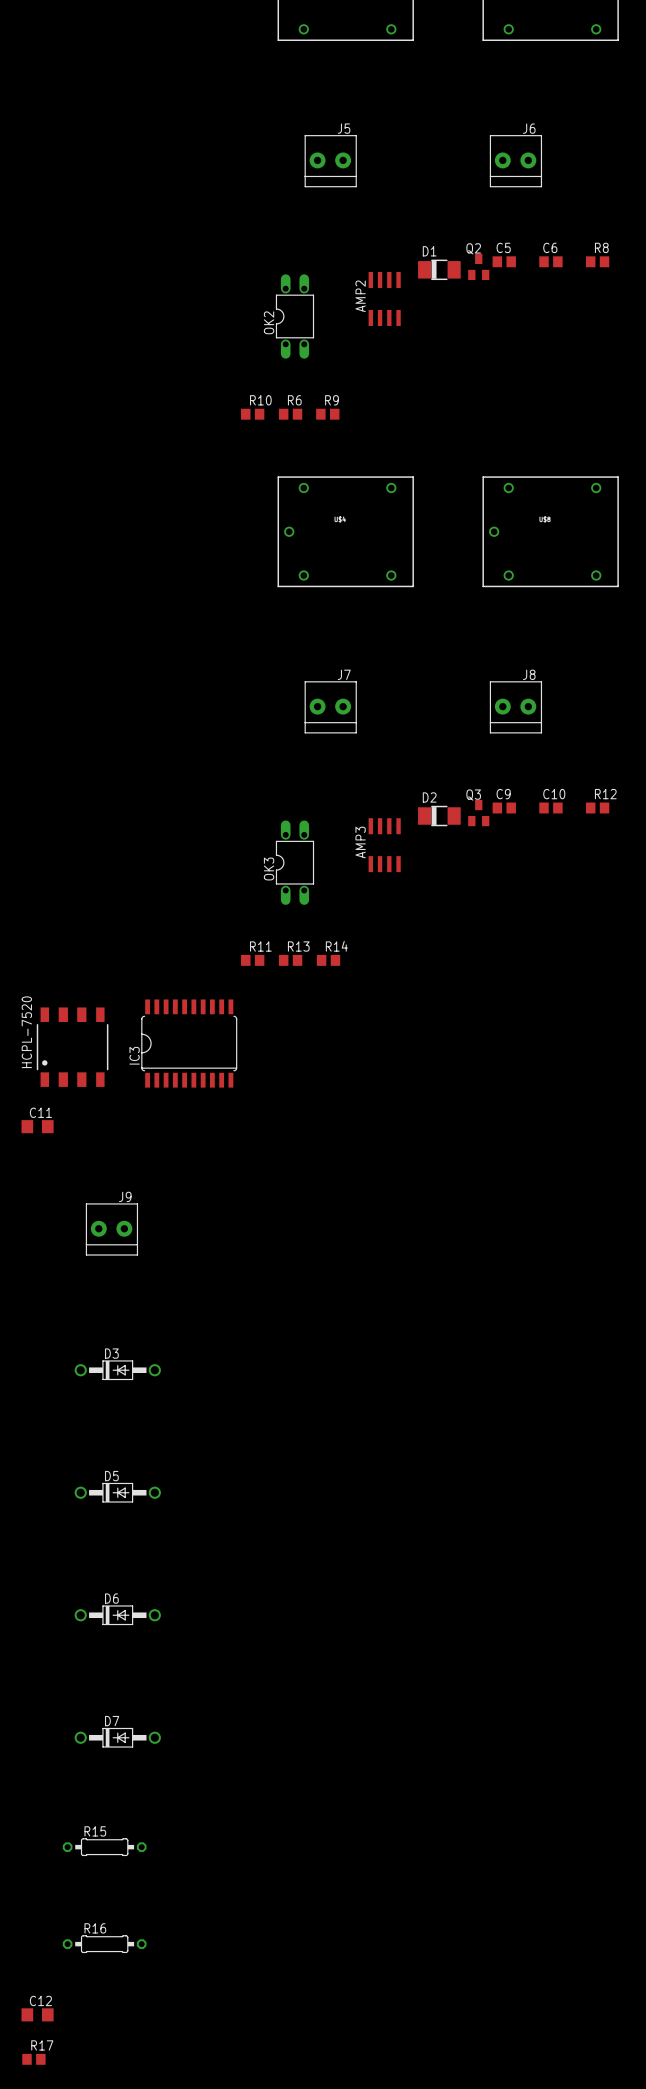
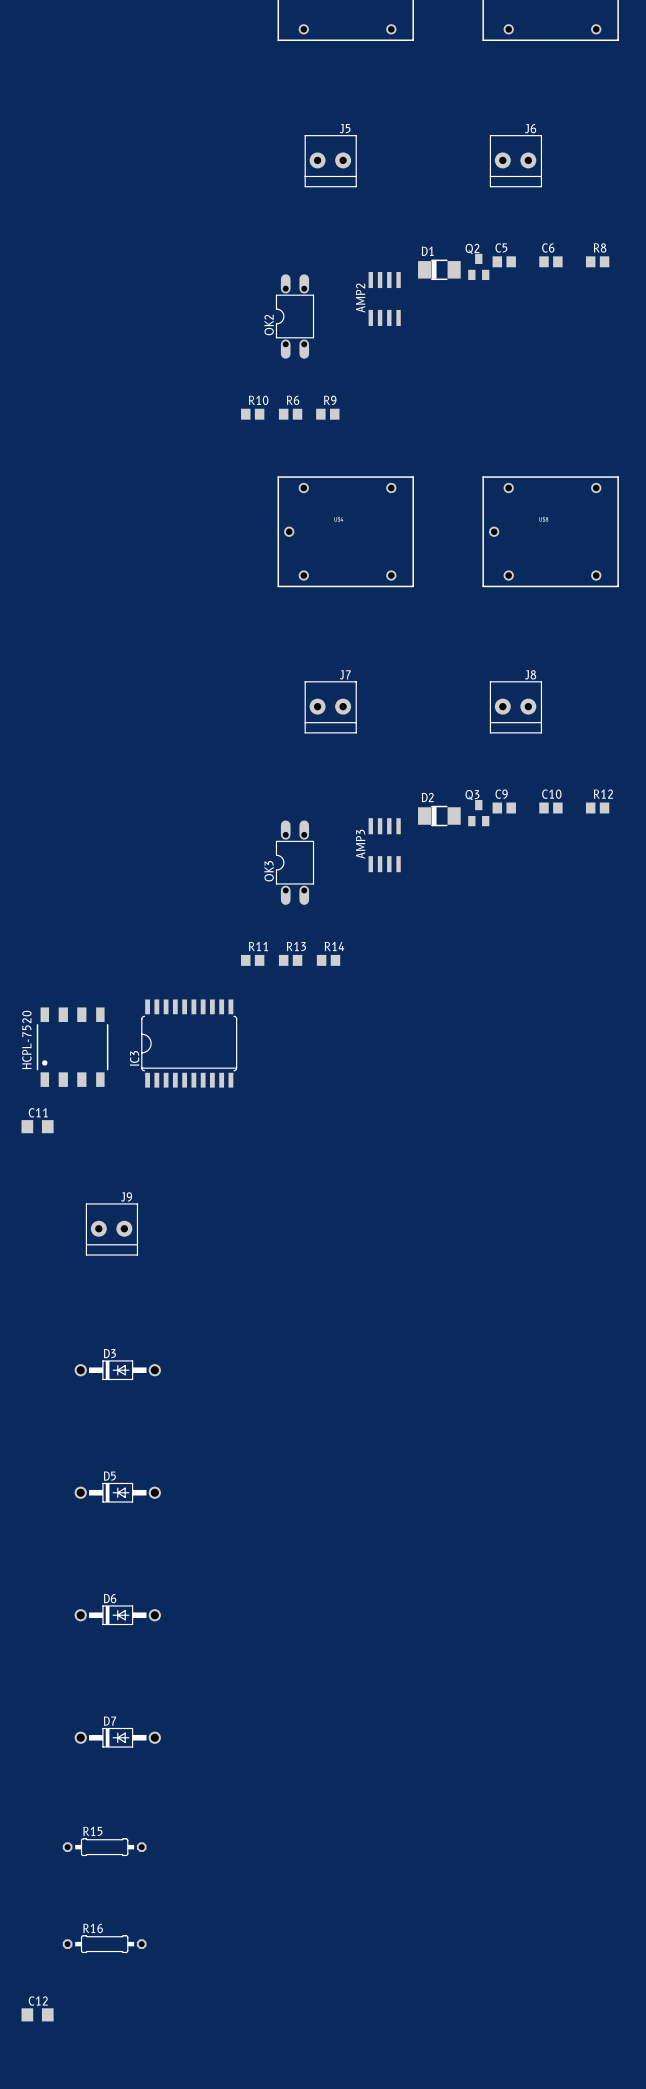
R17: (33, 2059) -> none

